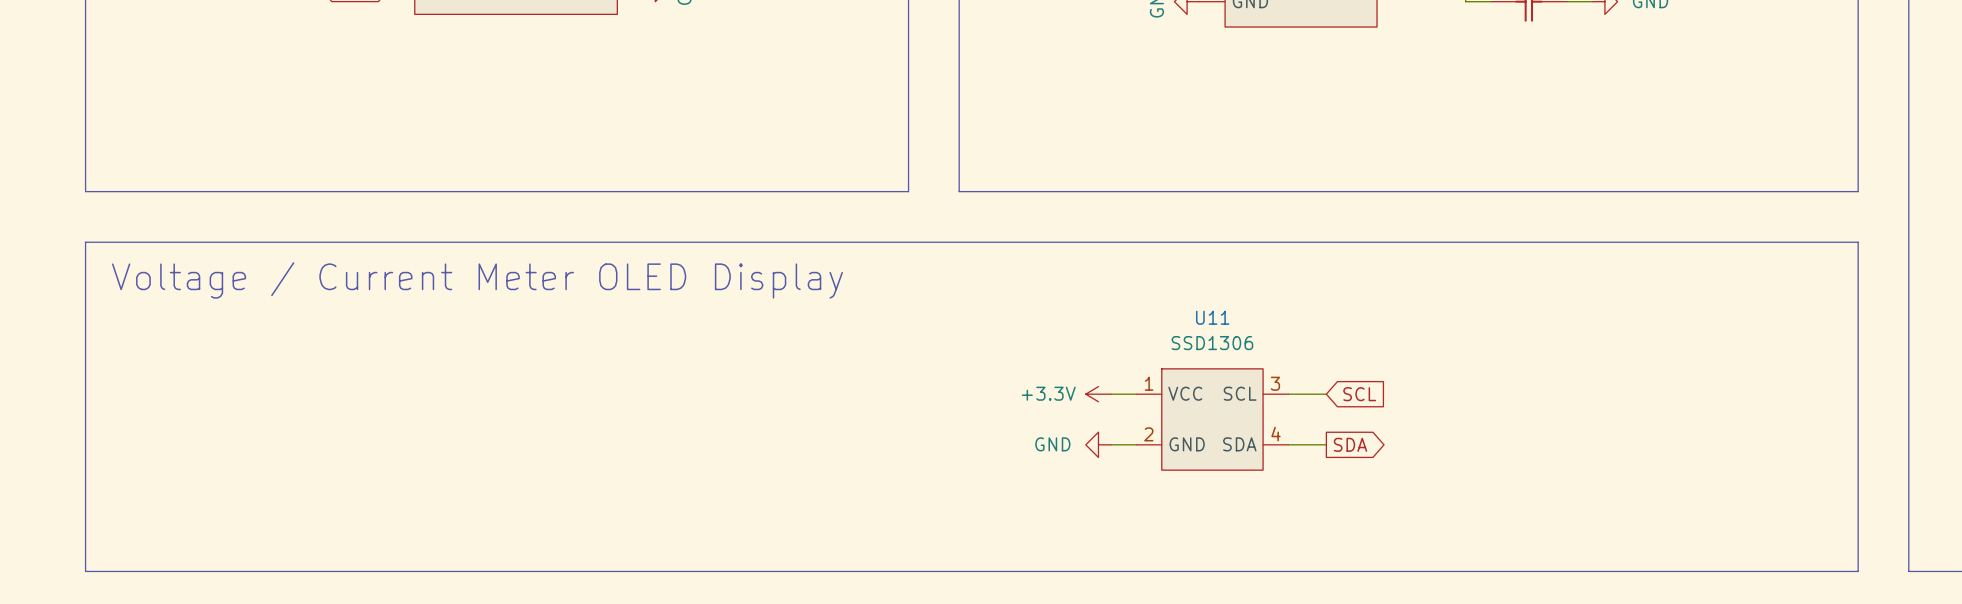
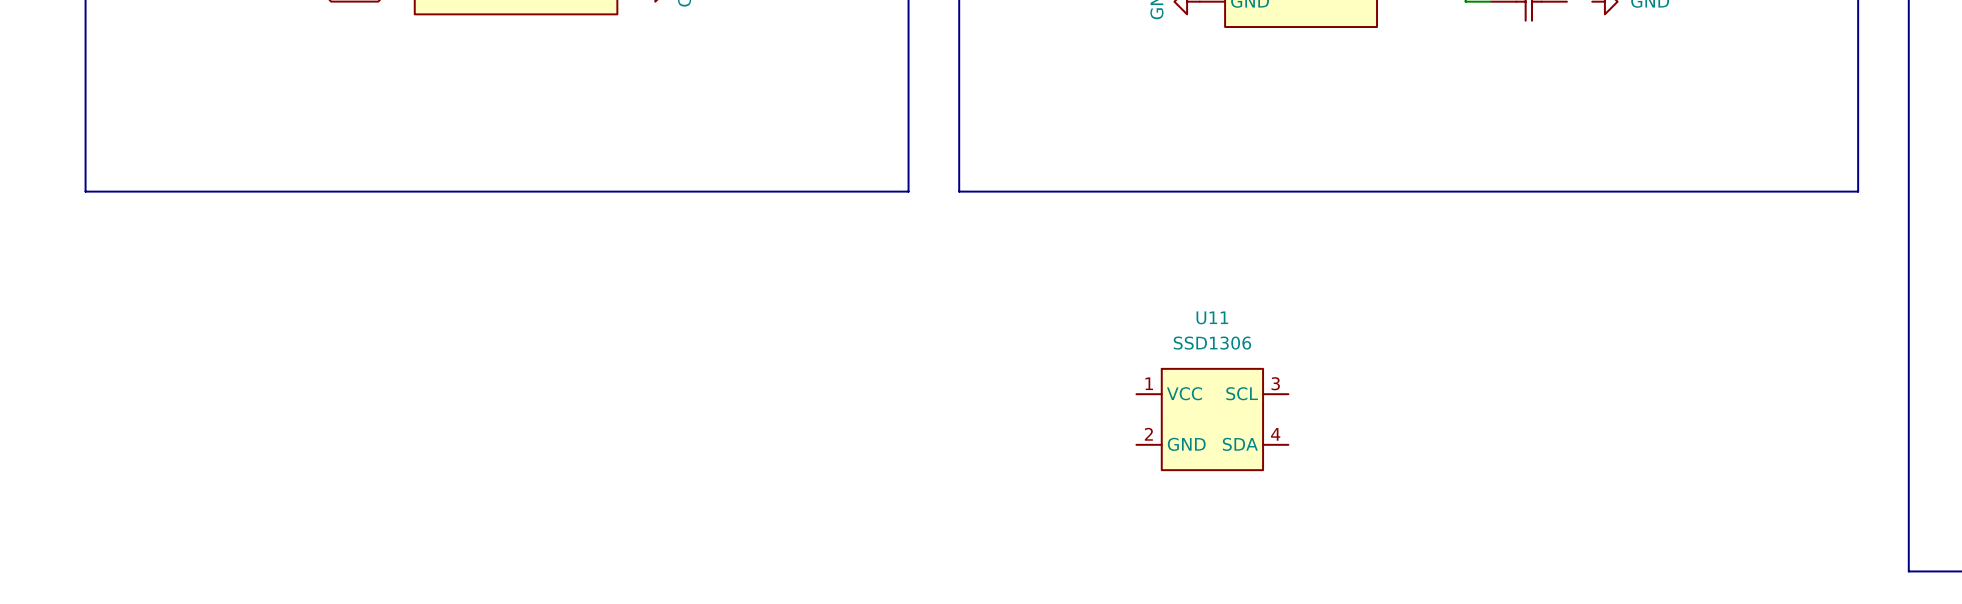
wire: (1566, 1) (1592, 1) -> none
line: (85, 242) (85, 571) (1858, 571) (1858, 242) (85, 242) -> none
text: Voltage / Current Meter OLED Display (477, 280) -> none
power symbol: +3.3V (1098, 394) -> none
wire: (1111, 394) (1136, 394) -> none
wire: (1288, 394) (1326, 394) -> none
global label: SCL (1359, 394) -> none
power symbol: GND (1098, 444) -> none
wire: (1111, 444) (1136, 444) -> none
wire: (1288, 444) (1326, 444) -> none
global label: SDA (1350, 444) -> none

